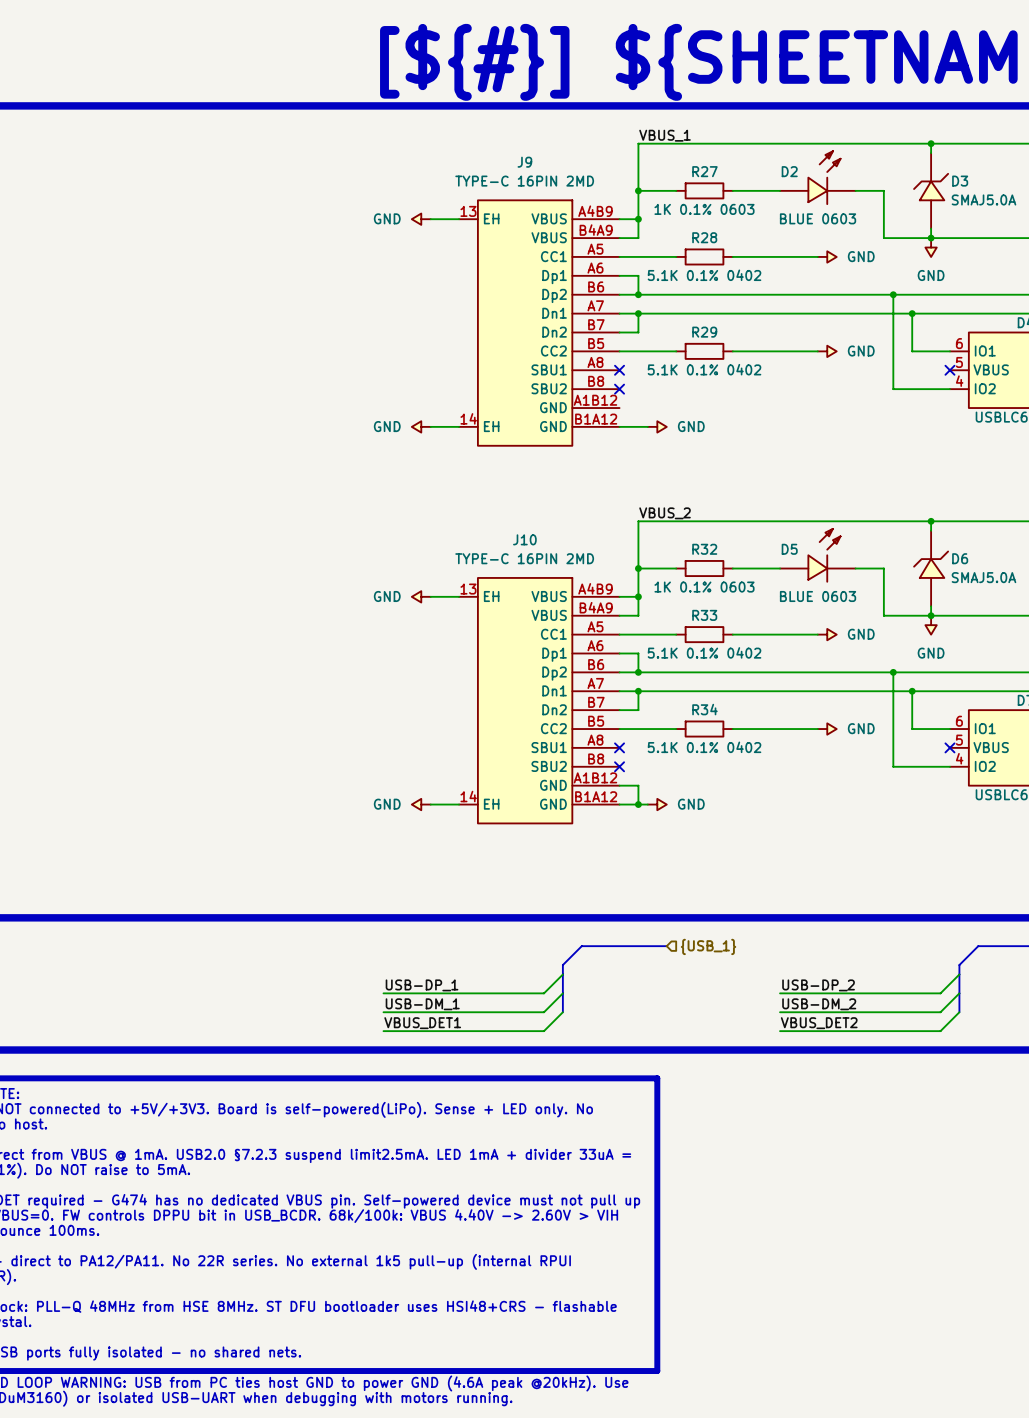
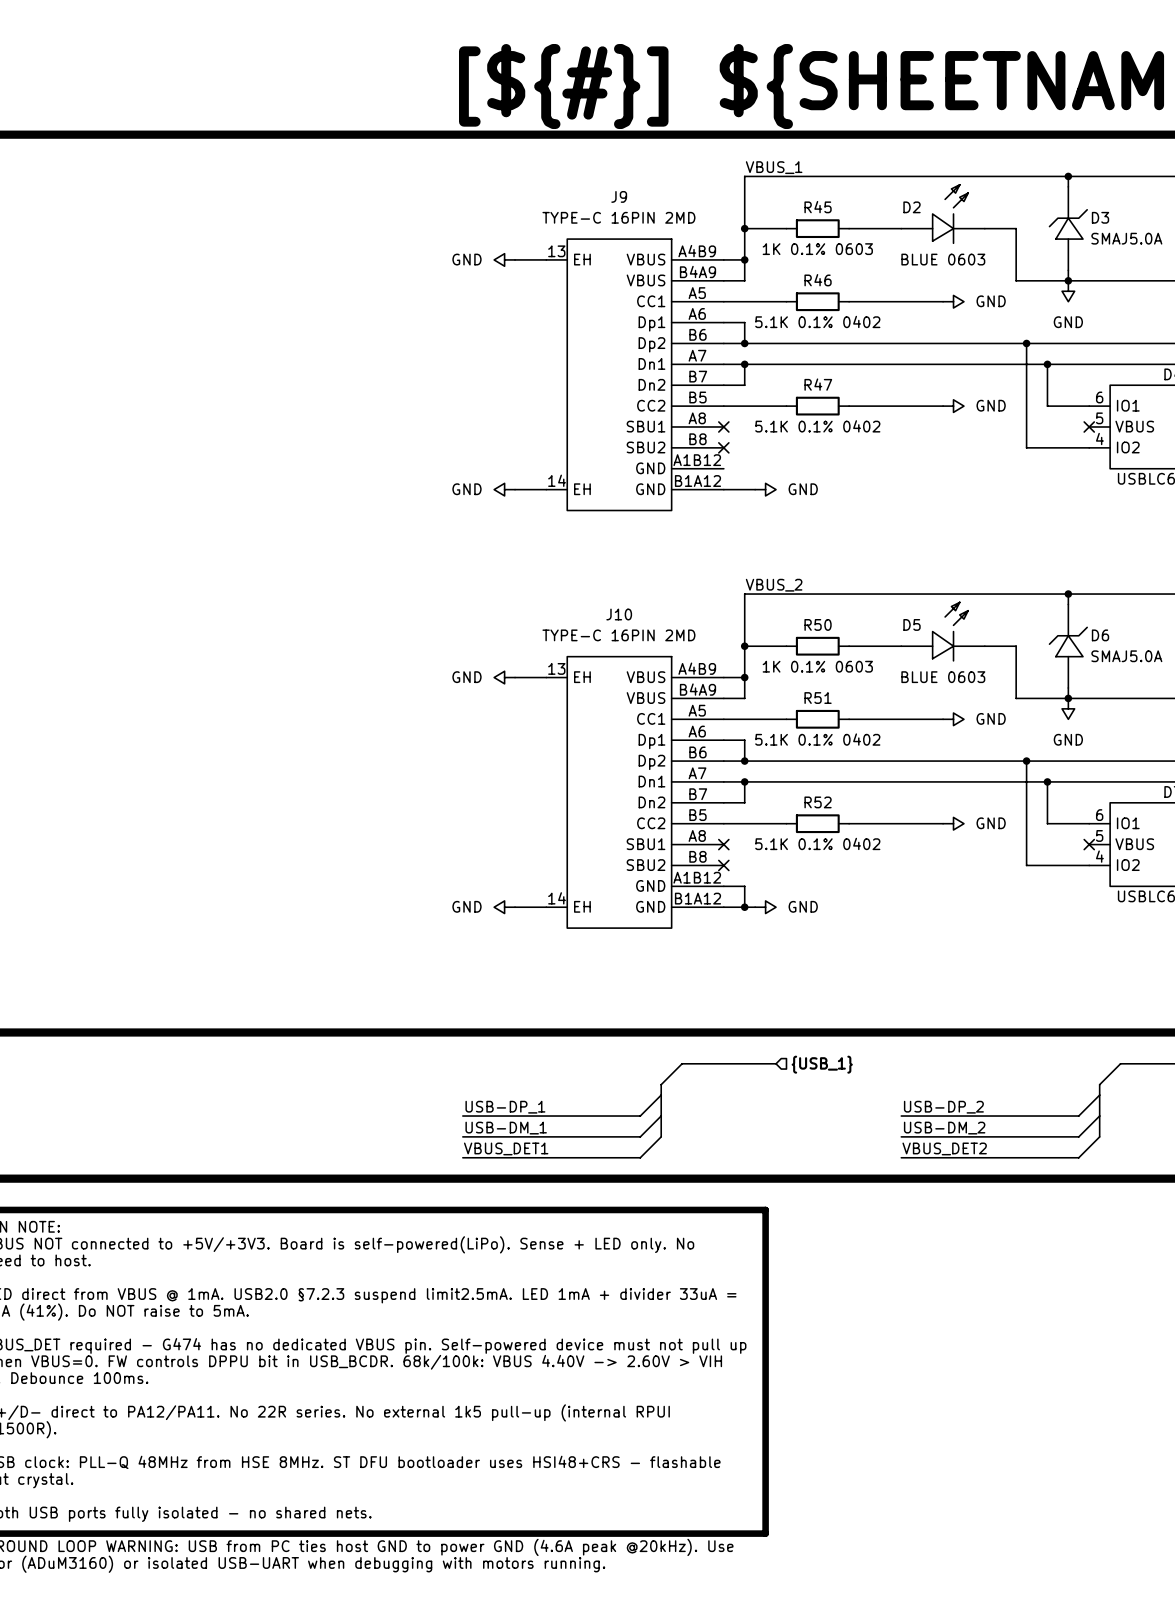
R27 name: R27 (704, 171) -> R45 (818, 207)
R28 name: R28 (704, 237) -> R46 (818, 280)
R29 name: R29 (704, 332) -> R47 (818, 384)
R32 name: R32 (704, 549) -> R50 (818, 624)
R33 name: R33 (704, 615) -> R51 (818, 698)
R34 name: R34 (704, 709) -> R52 (818, 802)

